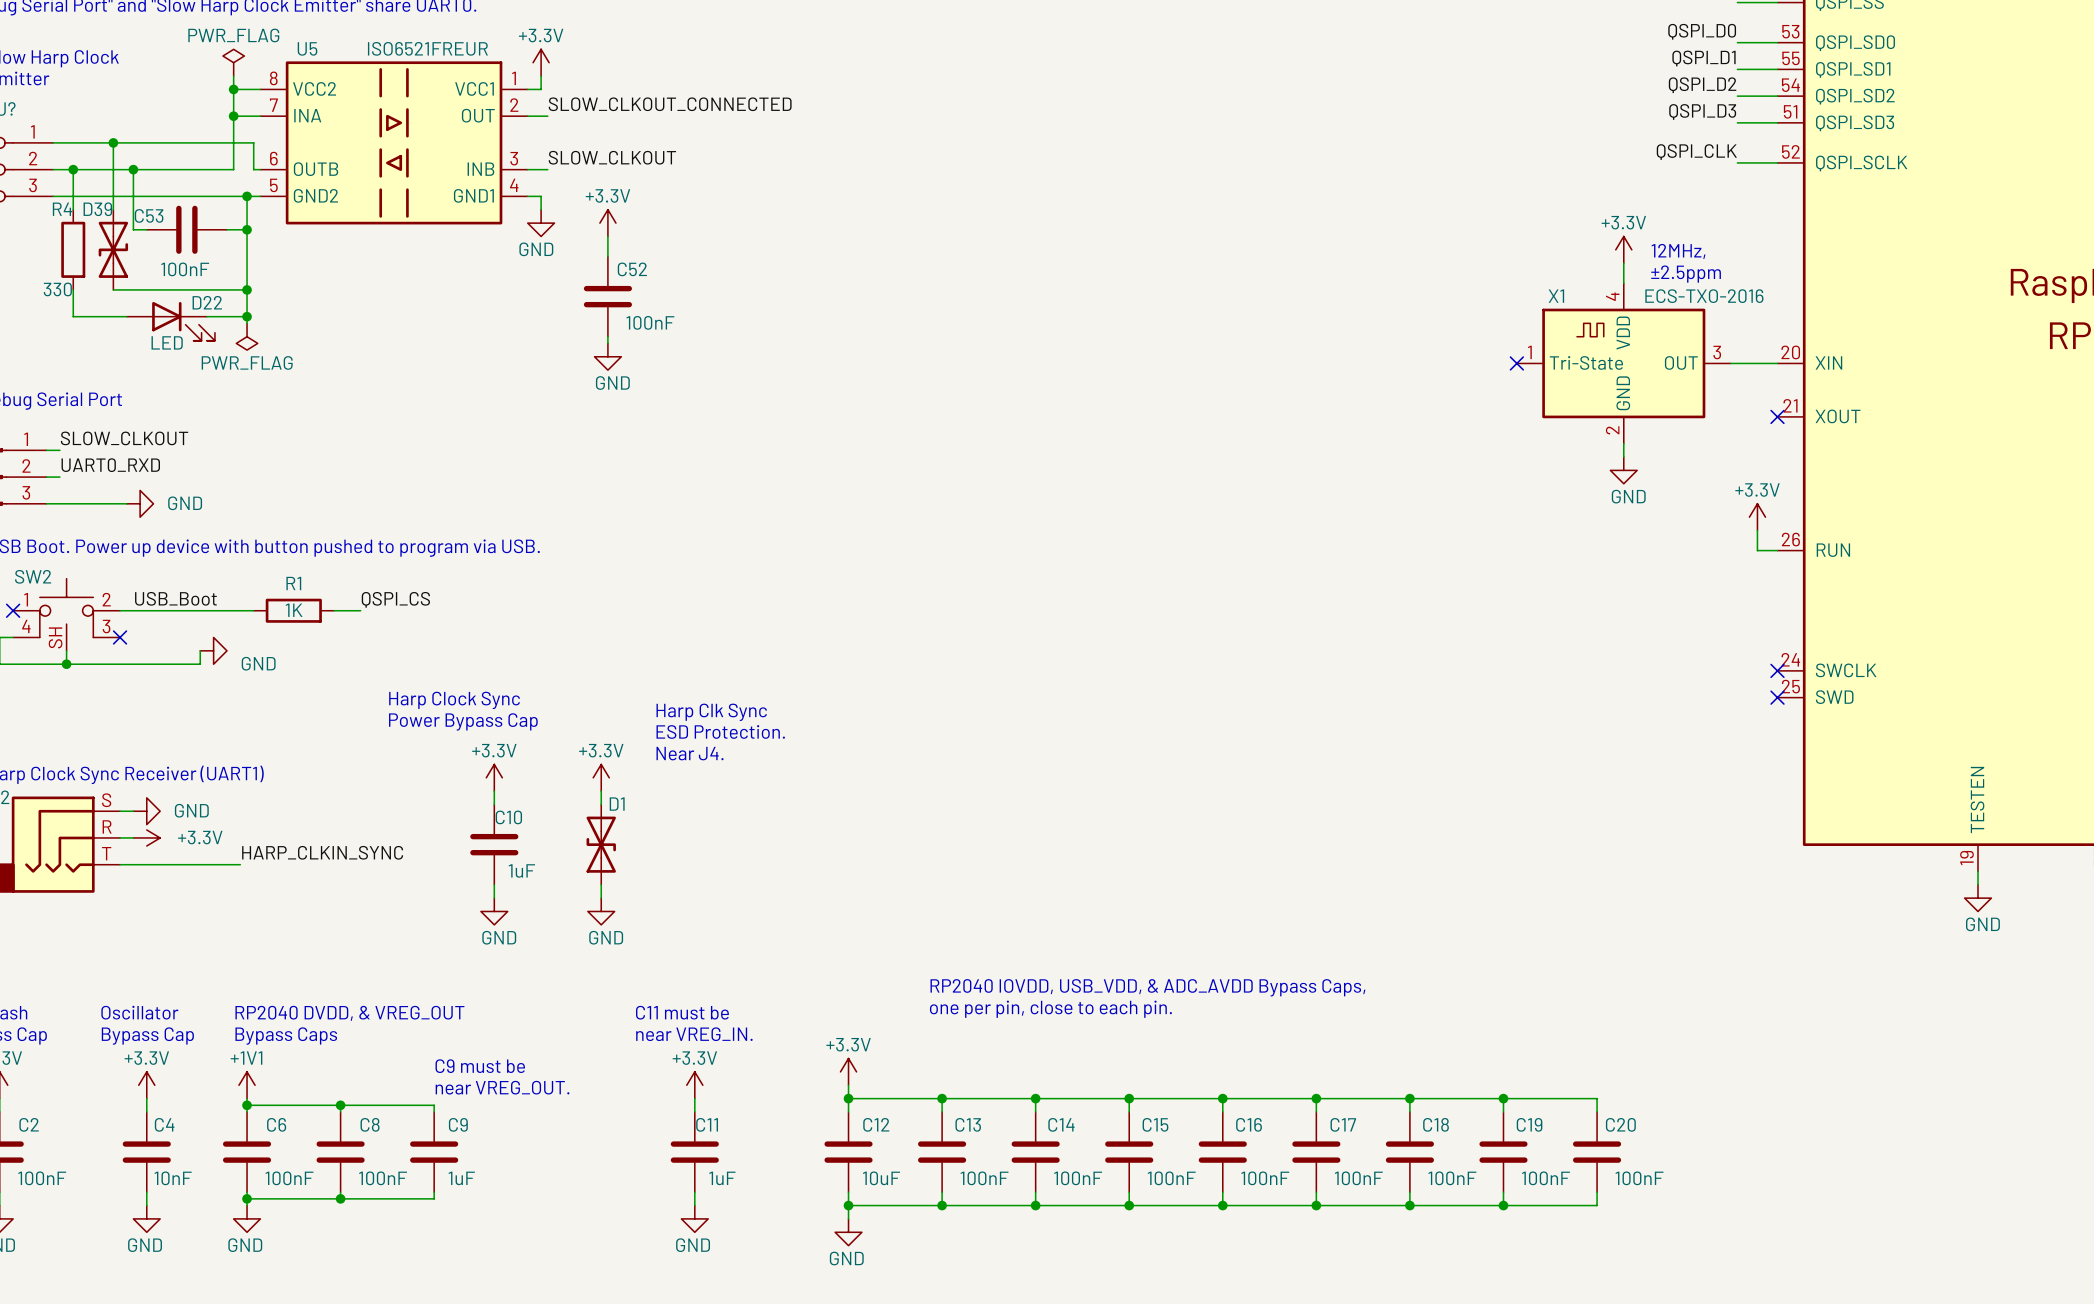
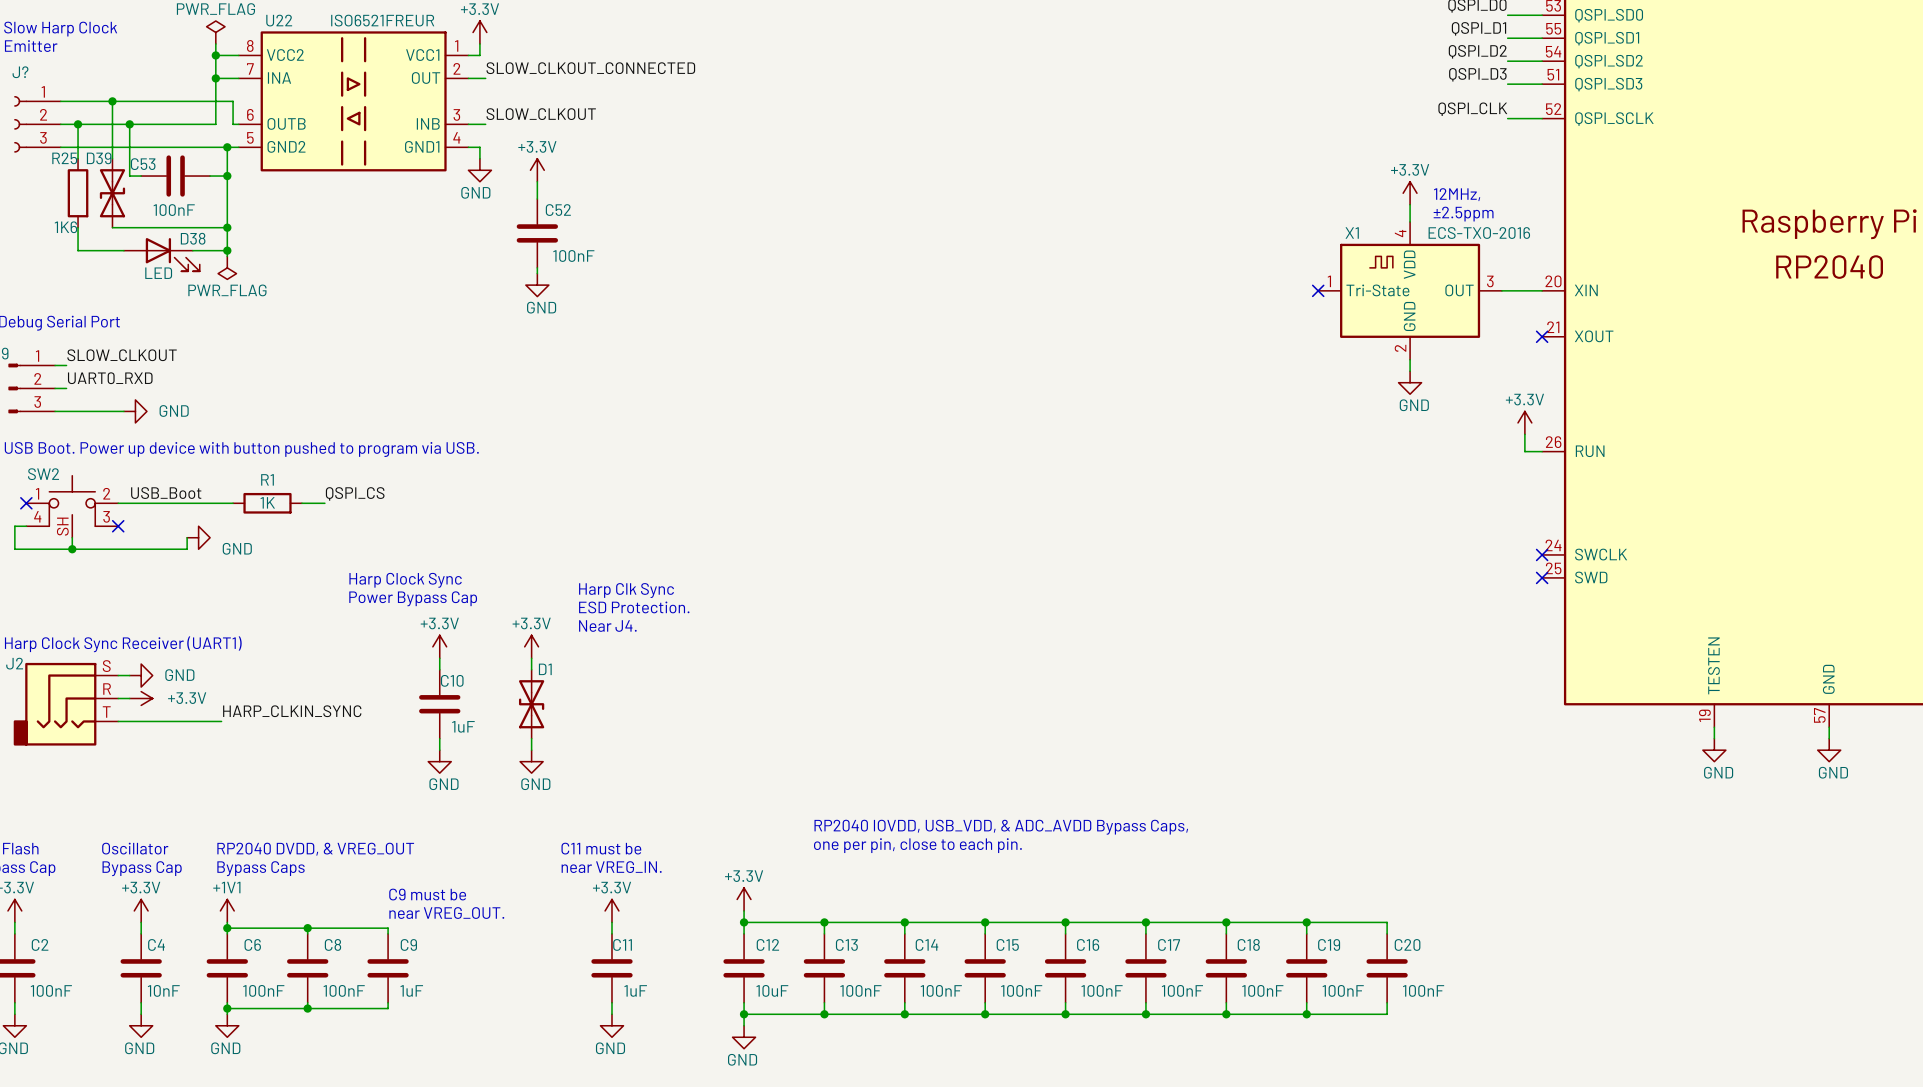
U5 name: U5 (307, 48) -> U22 (279, 20)
R4 name: R4 (62, 209) -> R25 (64, 158)
R4 value: 330 (57, 289) -> 1K6 (65, 227)
D22 name: D22 (207, 302) -> D38 (193, 238)

